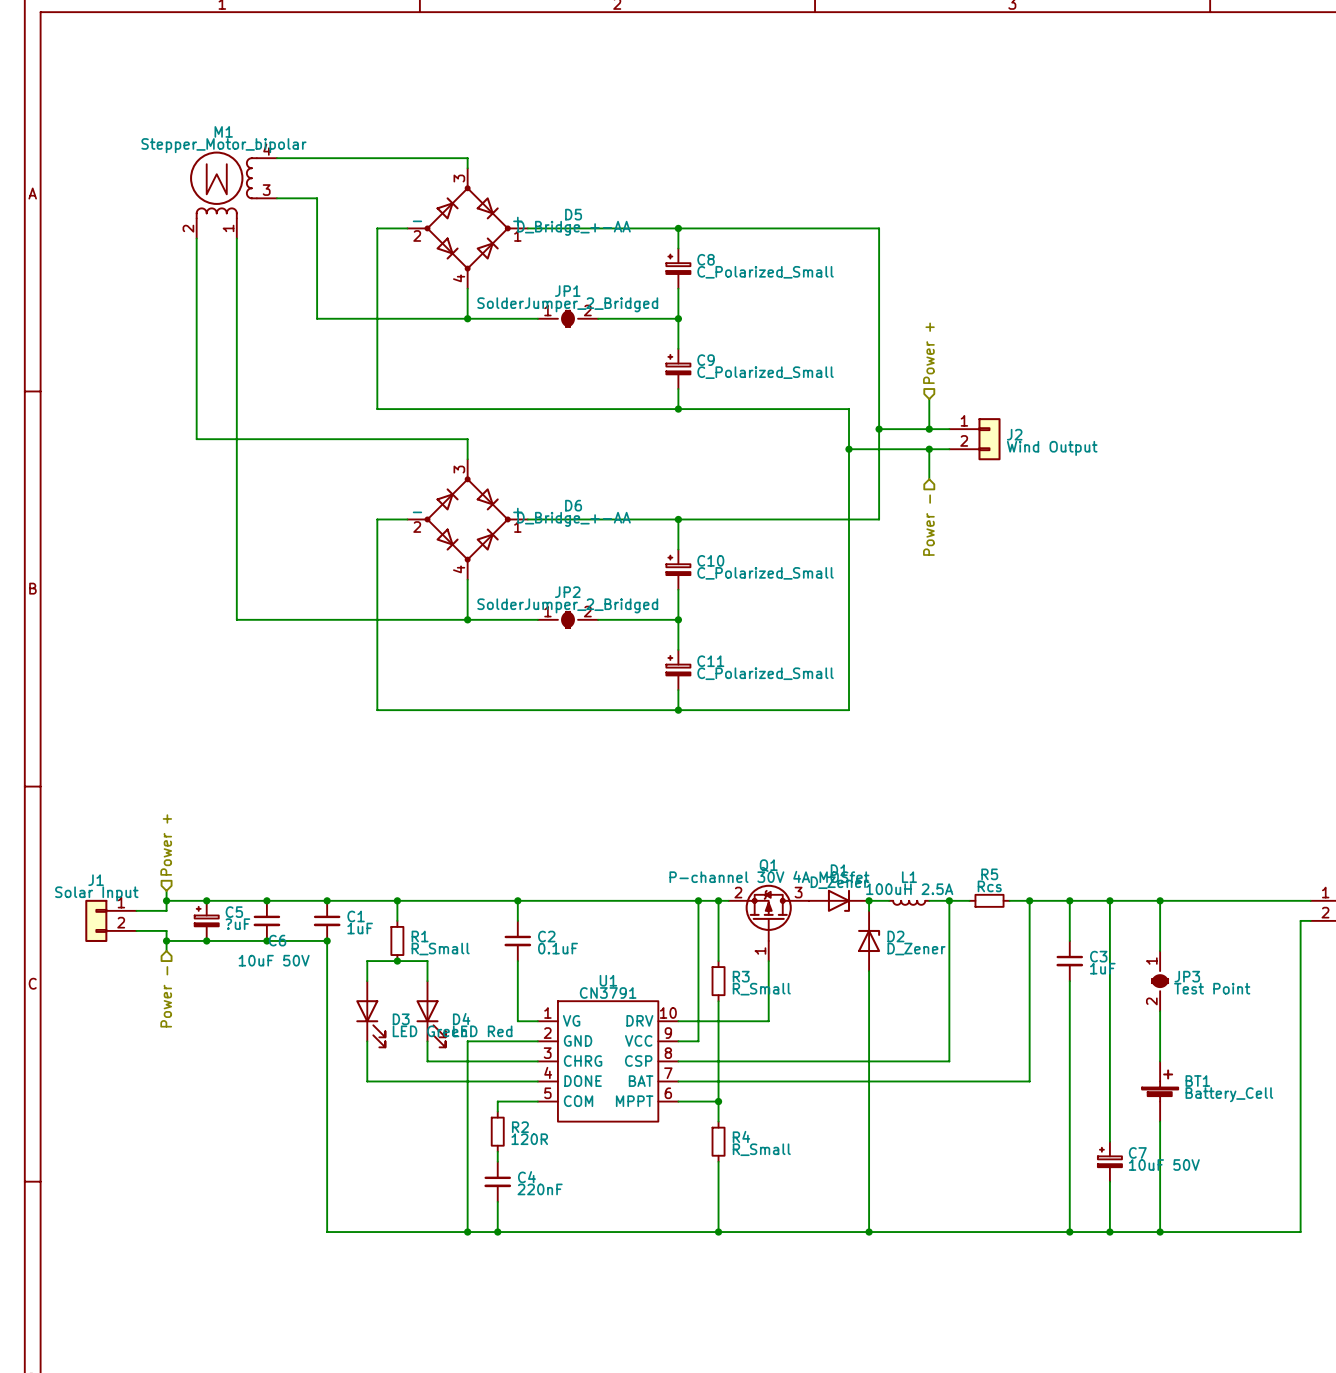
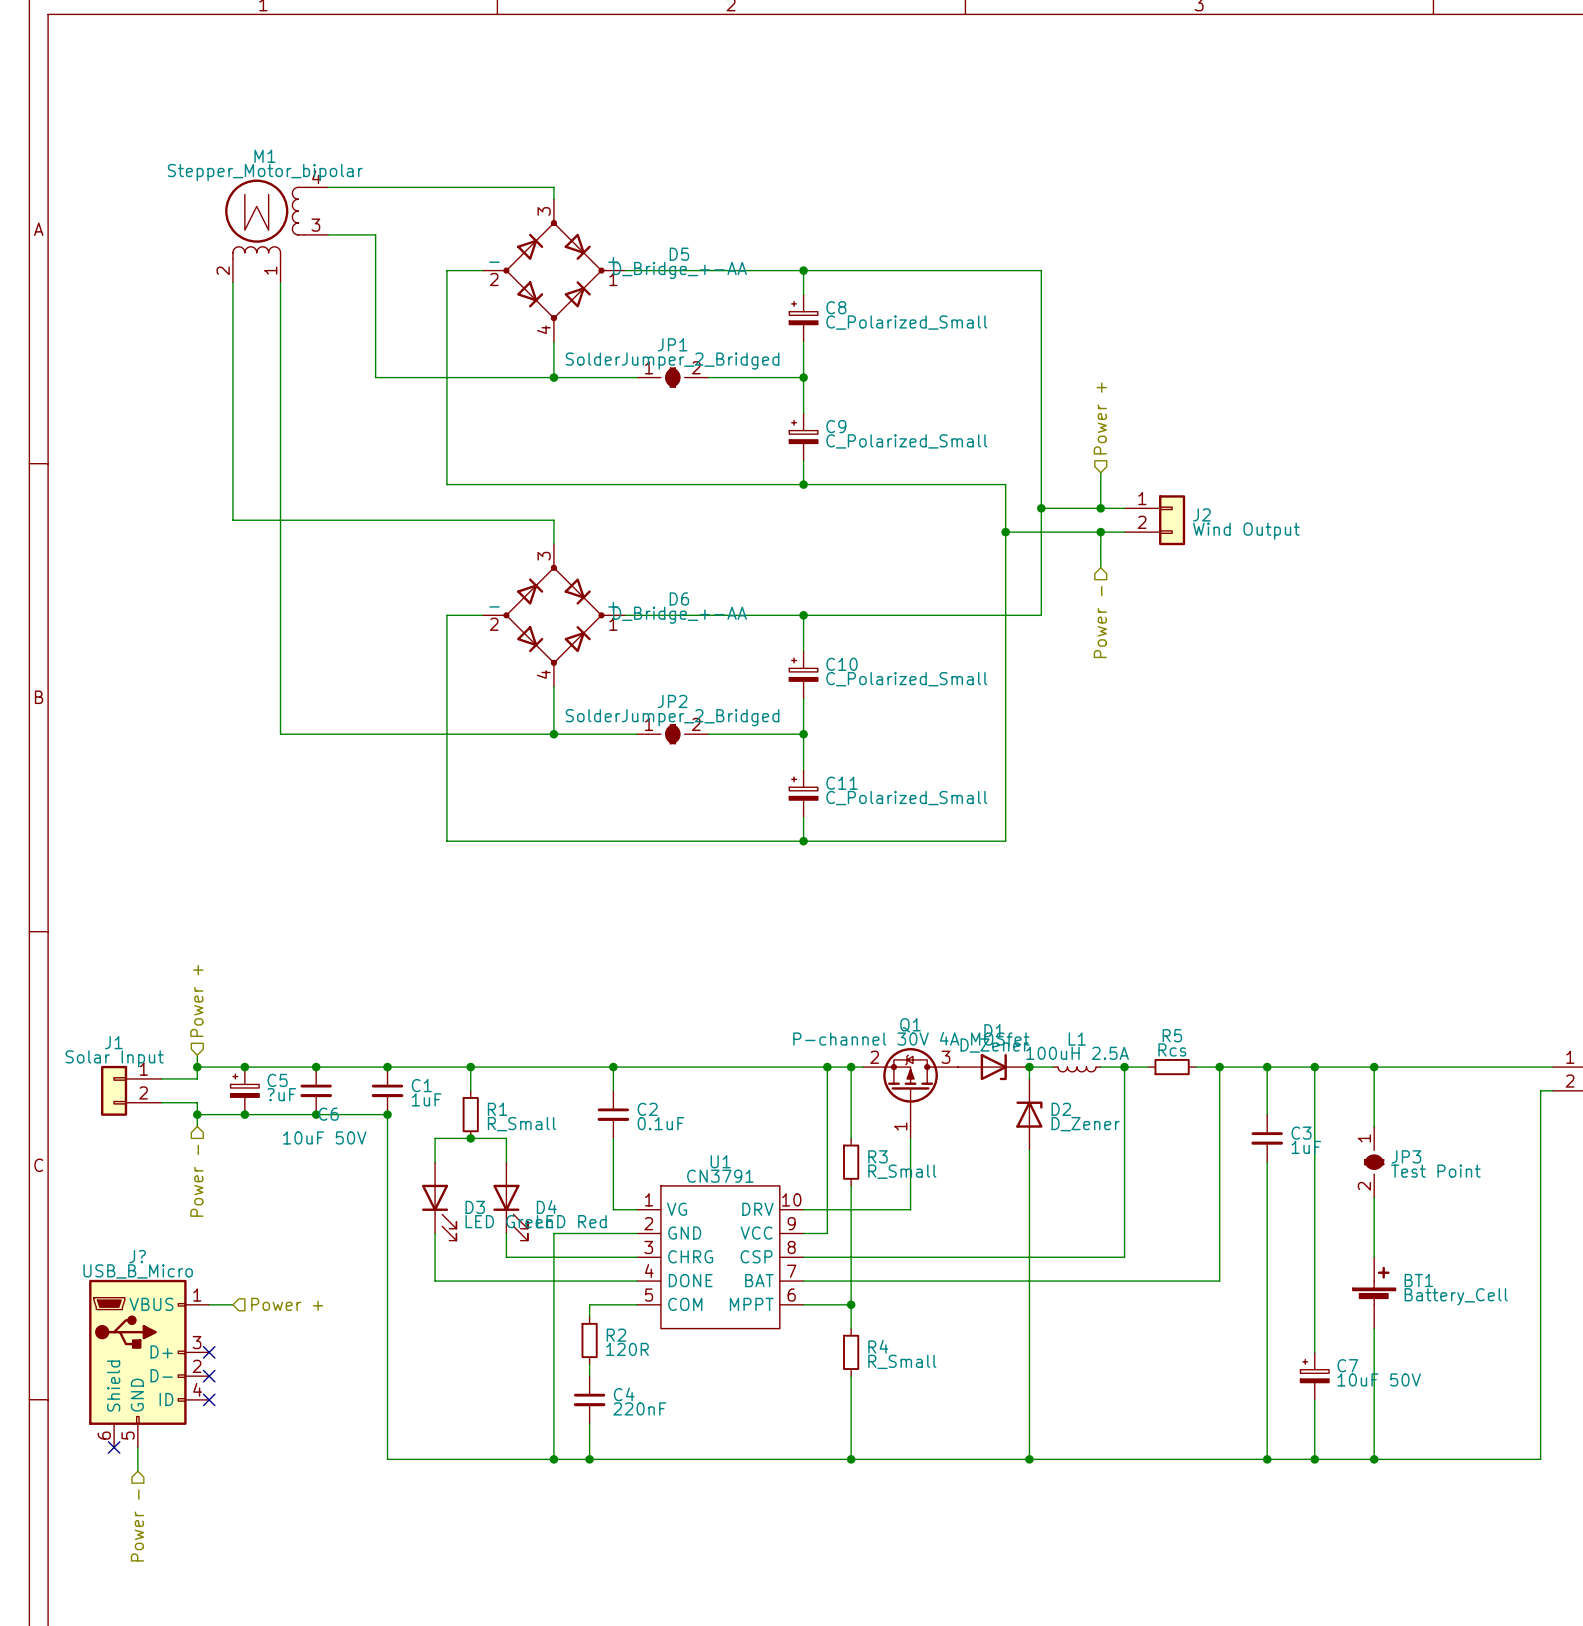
wire: none -> (209, 1304) (232, 1304)
hierarchical label: none -> Power + (287, 1304)
no-connect mark: none -> (209, 1352)
J?: none -> USB_B_Micro (149, 1363)
no-connect mark: none -> (209, 1376)
no-connect mark: none -> (209, 1399)
no-connect mark: none -> (114, 1447)
wire: none -> (137, 1447) (137, 1471)
hierarchical label: none -> Power - (137, 1525)

